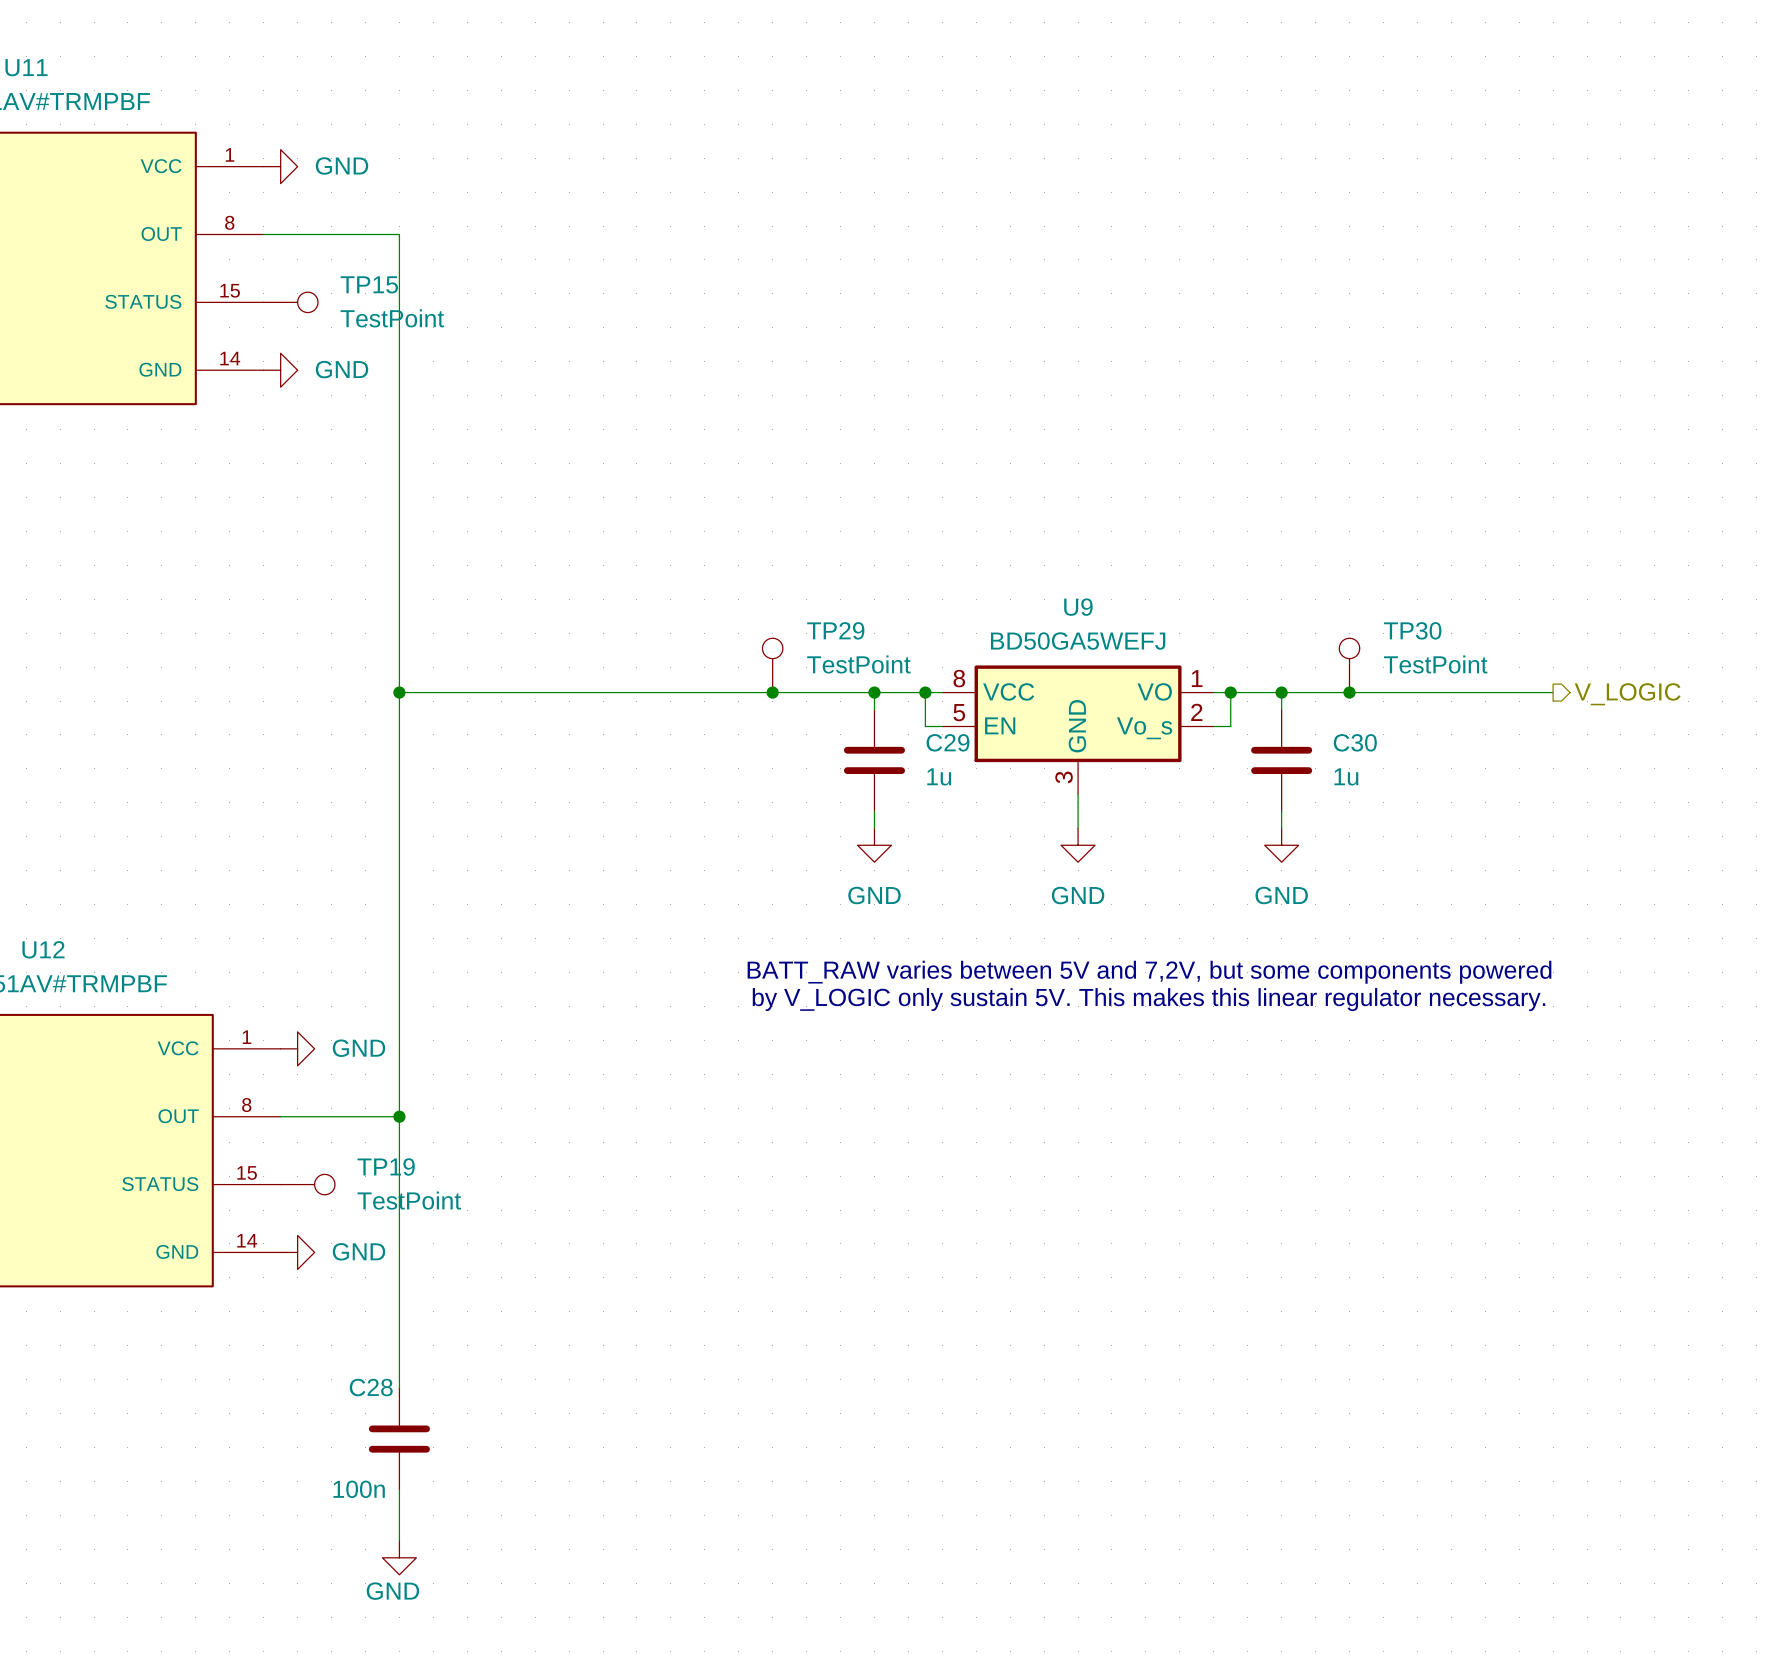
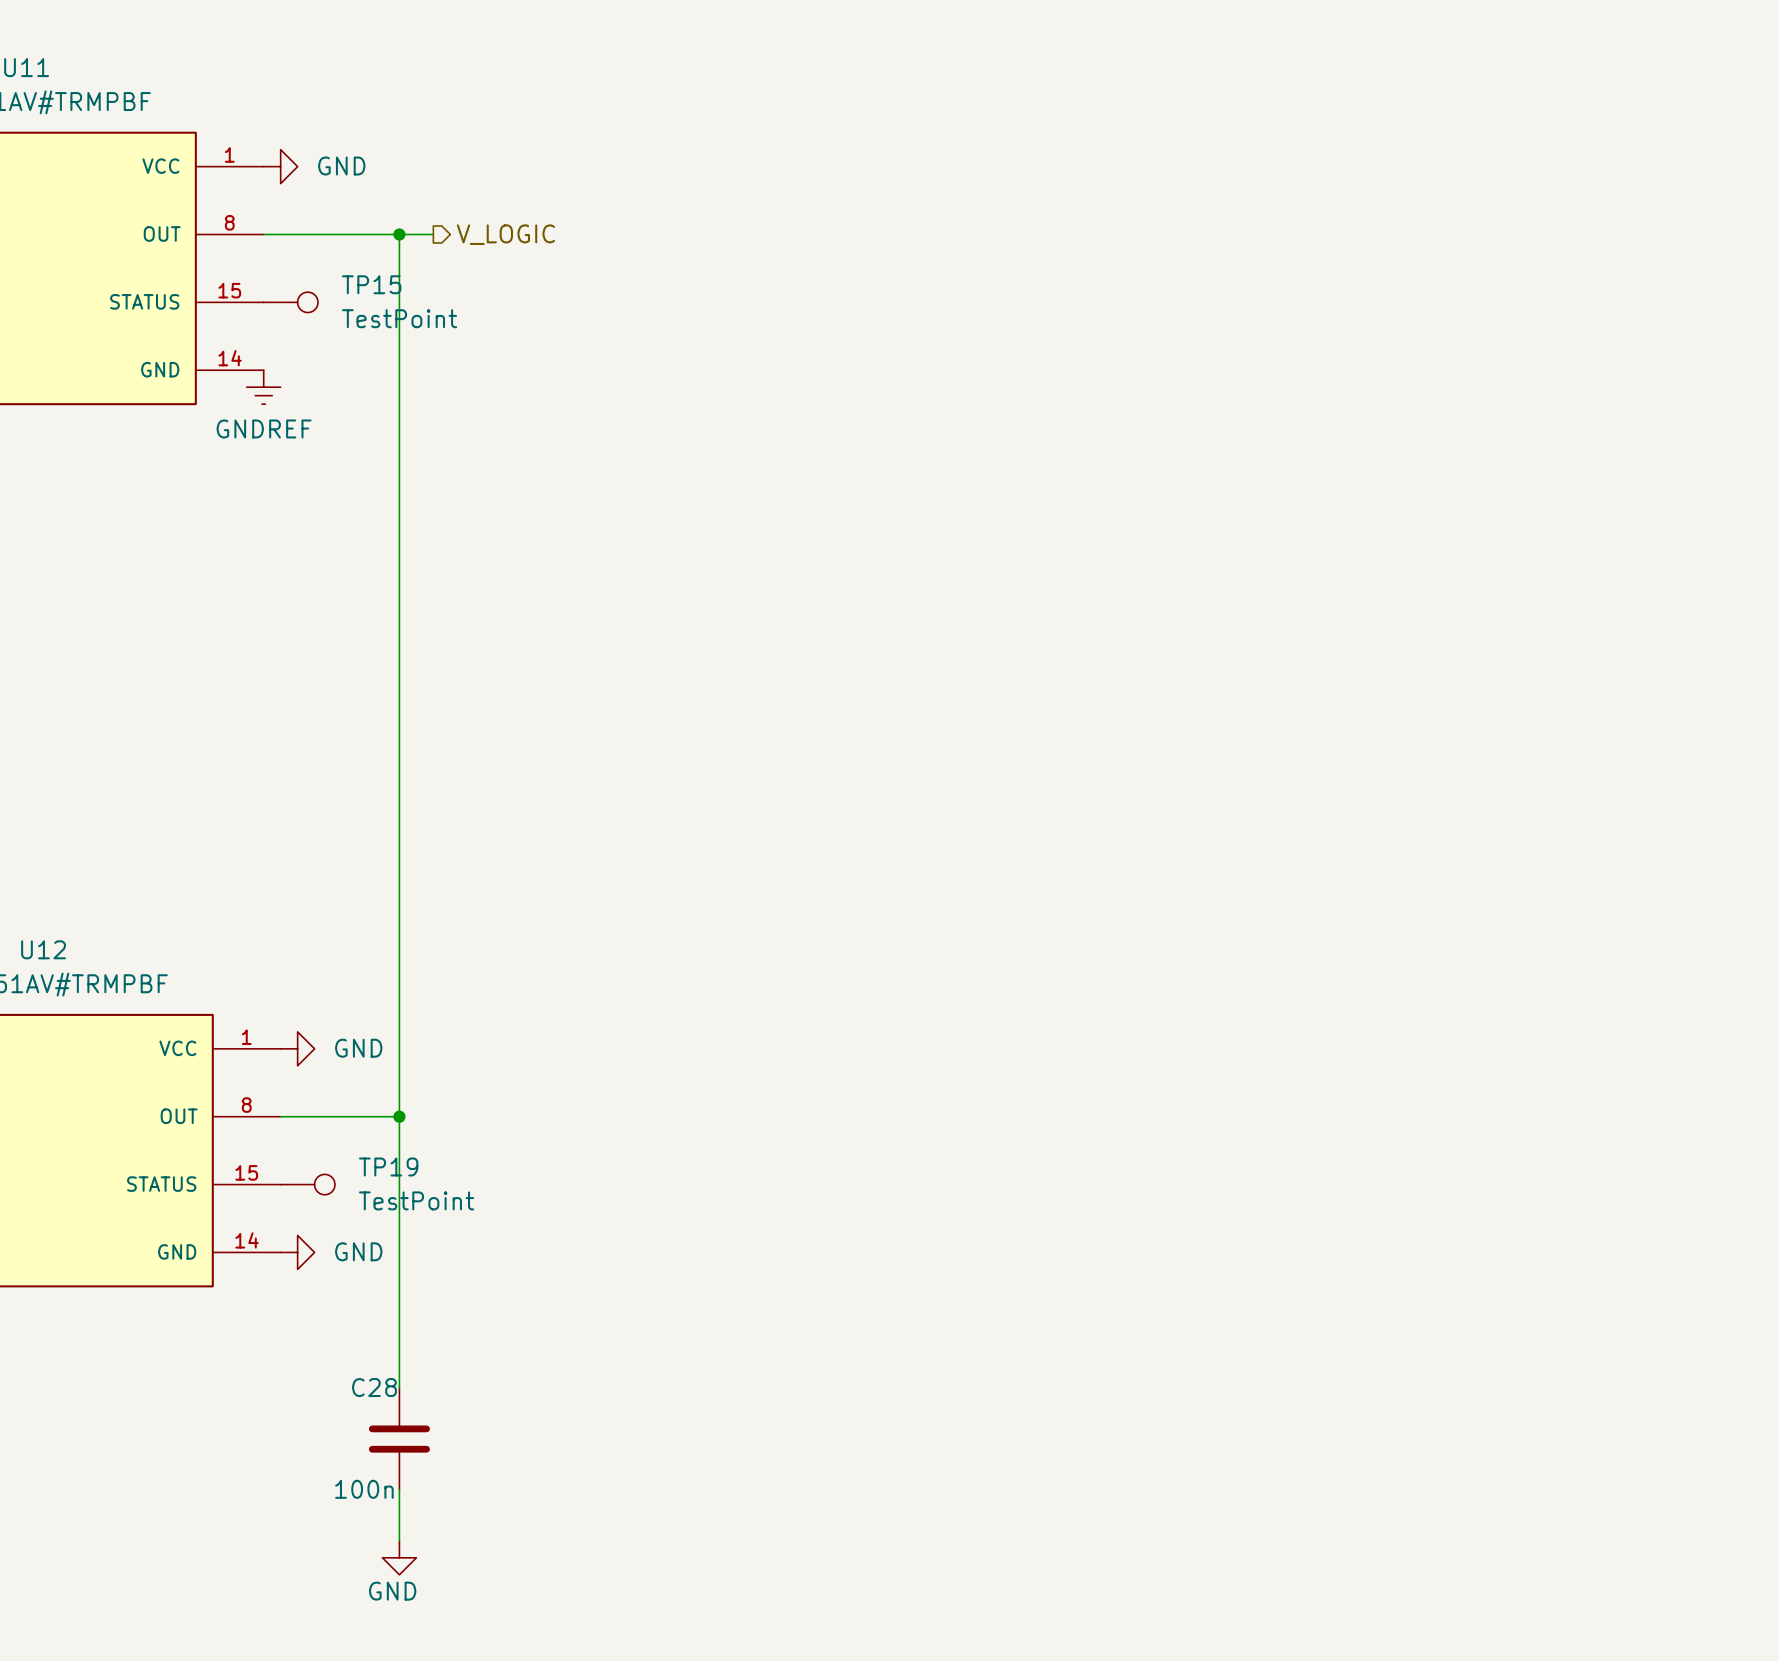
wire: none -> (399, 234) (433, 234)
junction: none -> (399, 234)
hierarchical label: none -> V_LOGIC (505, 234)
power symbol: GND (280, 370) -> none
power symbol: none -> GNDREF (263, 387)
TP29: TestPoint (772, 665) -> none
TP30: TestPoint (1349, 665) -> none
wire: (399, 692) (942, 692) -> none
junction: (399, 692) -> none
junction: (772, 692) -> none
wire: (874, 692) (874, 709) -> none
junction: (874, 692) -> none
wire: (925, 692) (925, 726) (942, 726) -> none
junction: (925, 692) -> none
wire: (1213, 692) (1553, 692) -> none
wire: (1230, 692) (1230, 726) (1213, 726) -> none
junction: (1230, 692) -> none
wire: (1281, 692) (1281, 709) -> none
junction: (1281, 692) -> none
junction: (1349, 692) -> none
hierarchical label: V_LOGIC (1627, 694) -> none
U9: BD50GA5WEFJ (1078, 729) -> none
C29: 1u (874, 760) -> none
C30: 1u (1281, 760) -> none
wire: (1078, 794) (1078, 828) -> none
wire: (874, 811) (874, 828) -> none
wire: (1281, 811) (1281, 828) -> none
power symbol: GND (874, 845) -> none
power symbol: GND (1078, 845) -> none
power symbol: GND (1281, 845) -> none
text: BATT_RAW varies between 5V and 7,2V, but some components powered (1149, 972) -> none
text: by V_LOGIC only sustain 5V. This makes this linear regulator necessary. (1148, 999) -> none

